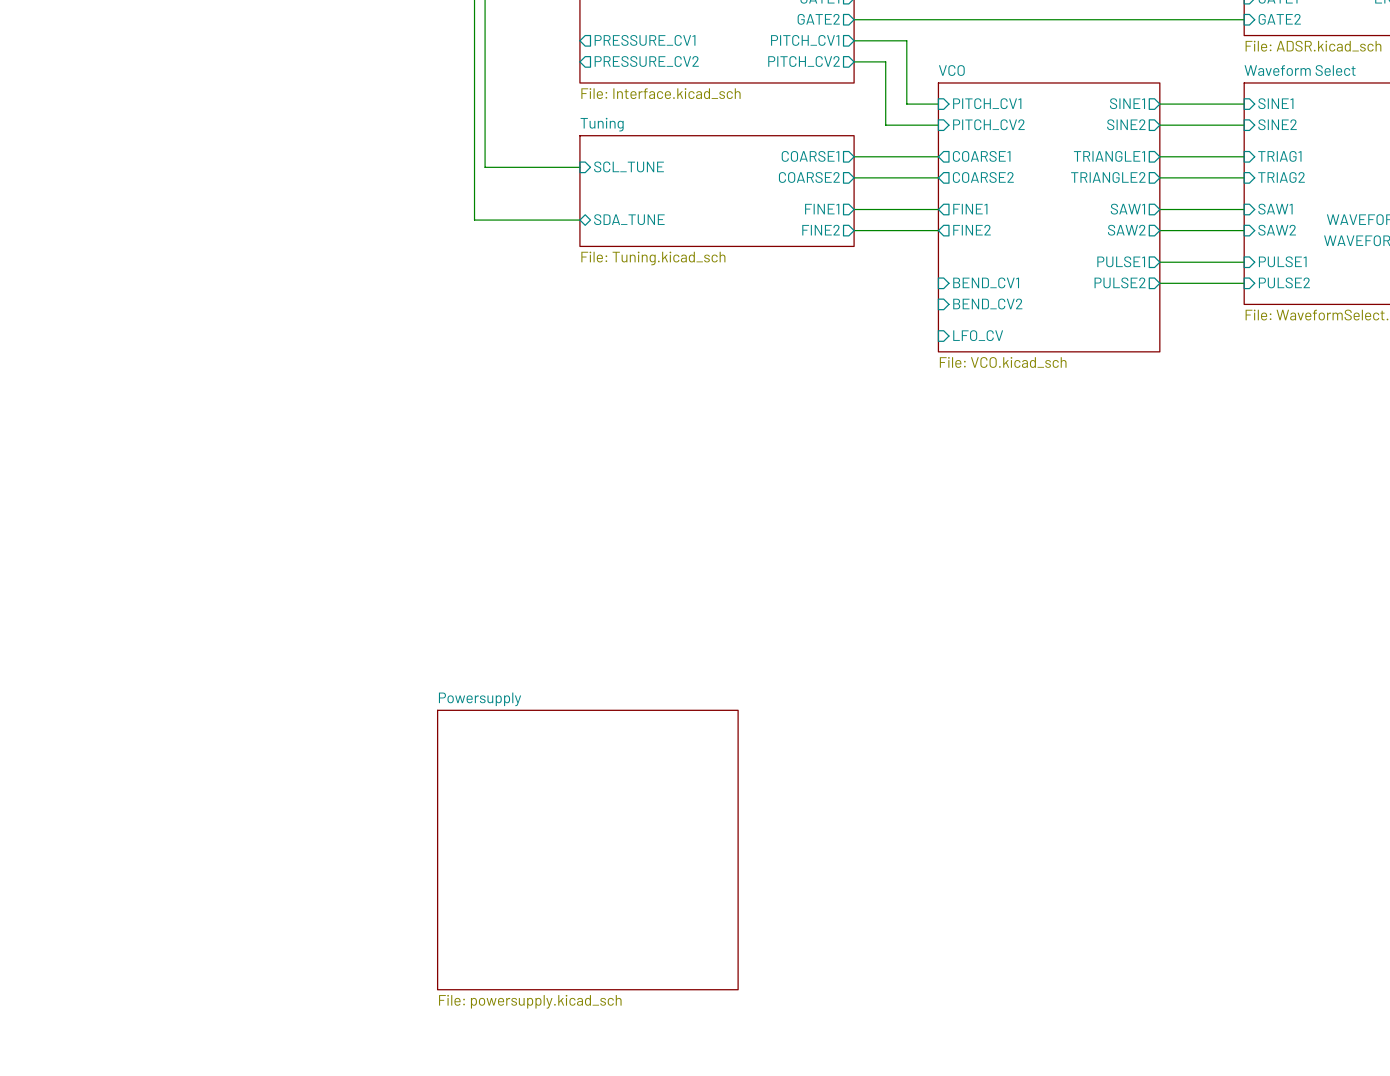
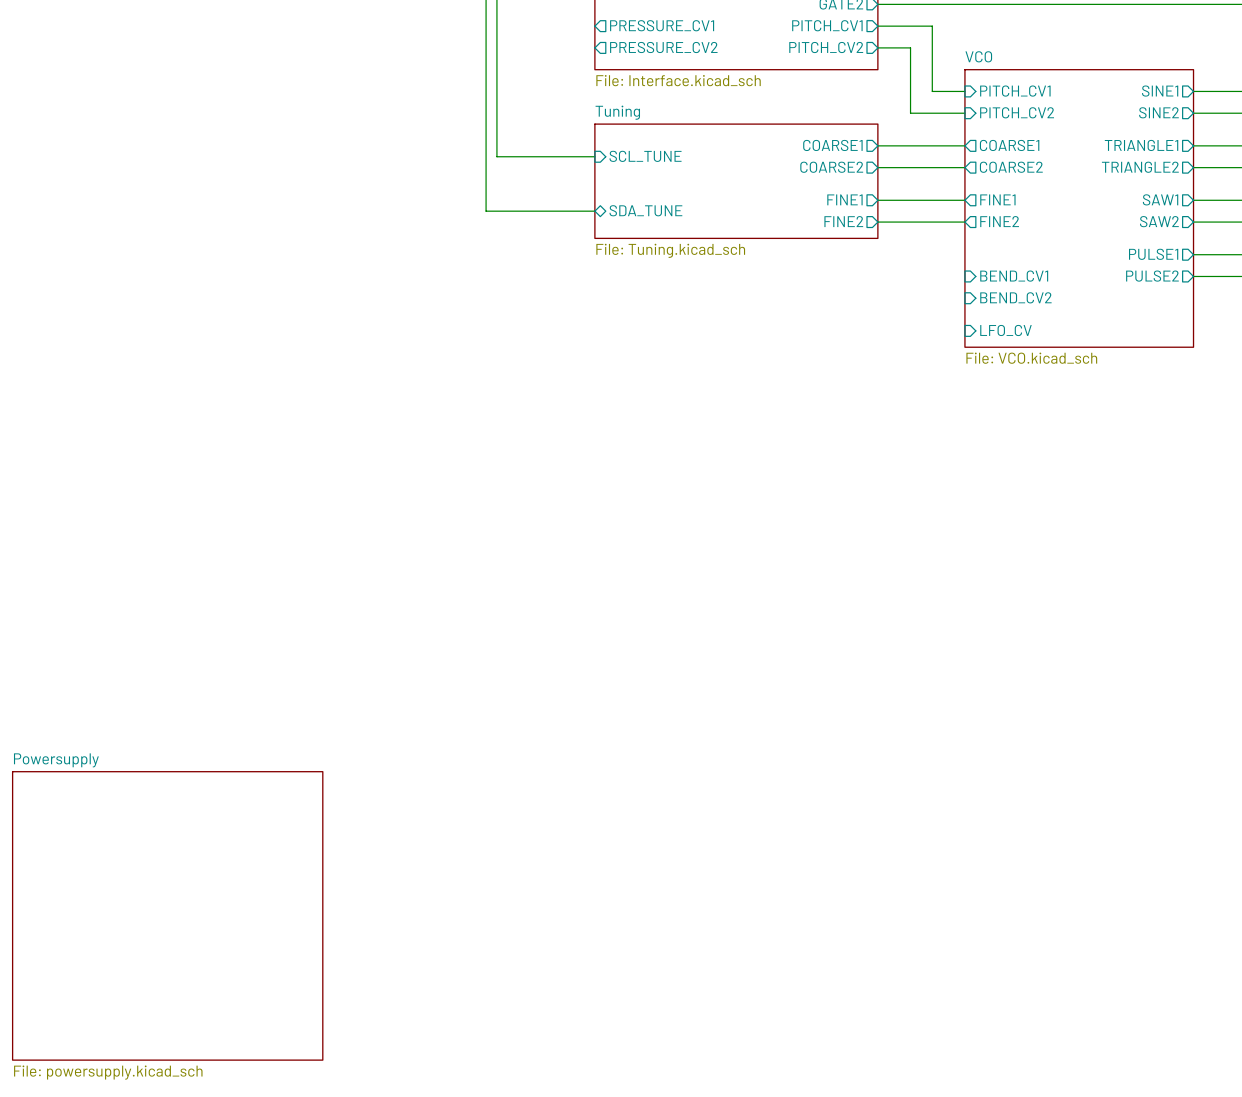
sheet Powersupply: File: powersupply.kicad_sch (587, 850) -> none
sheet Powersupply: none -> File: powersupply.kicad_sch (167, 915)

